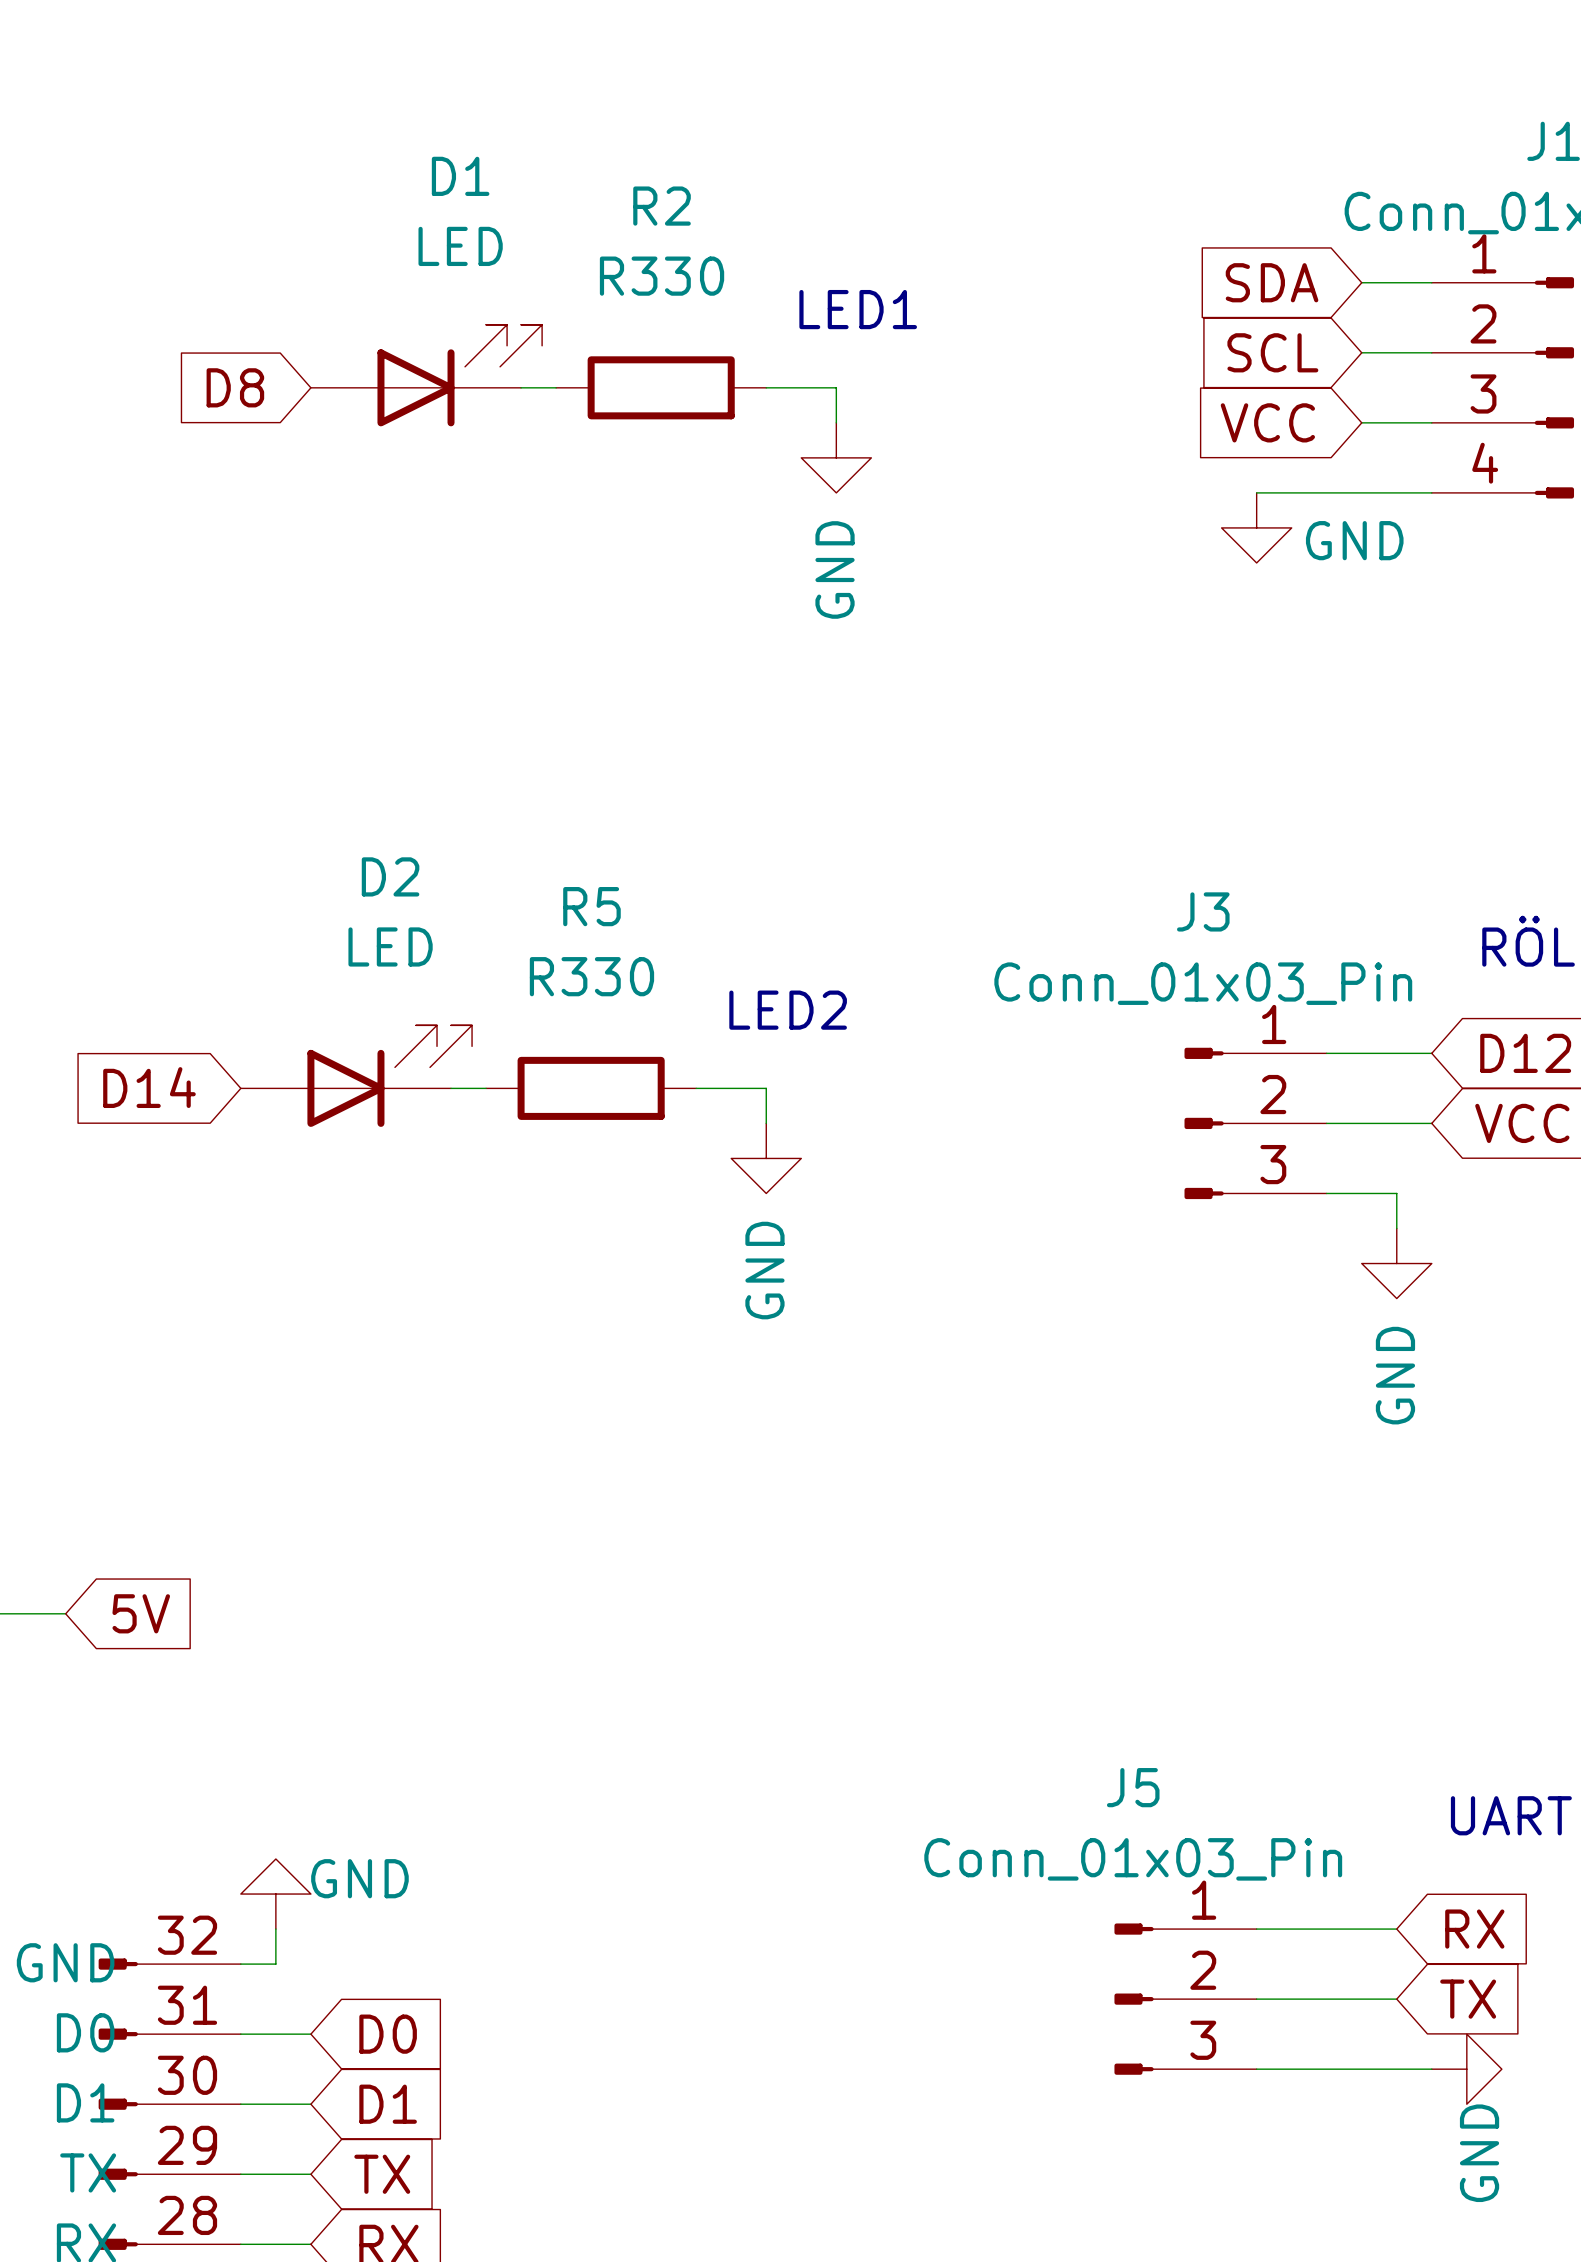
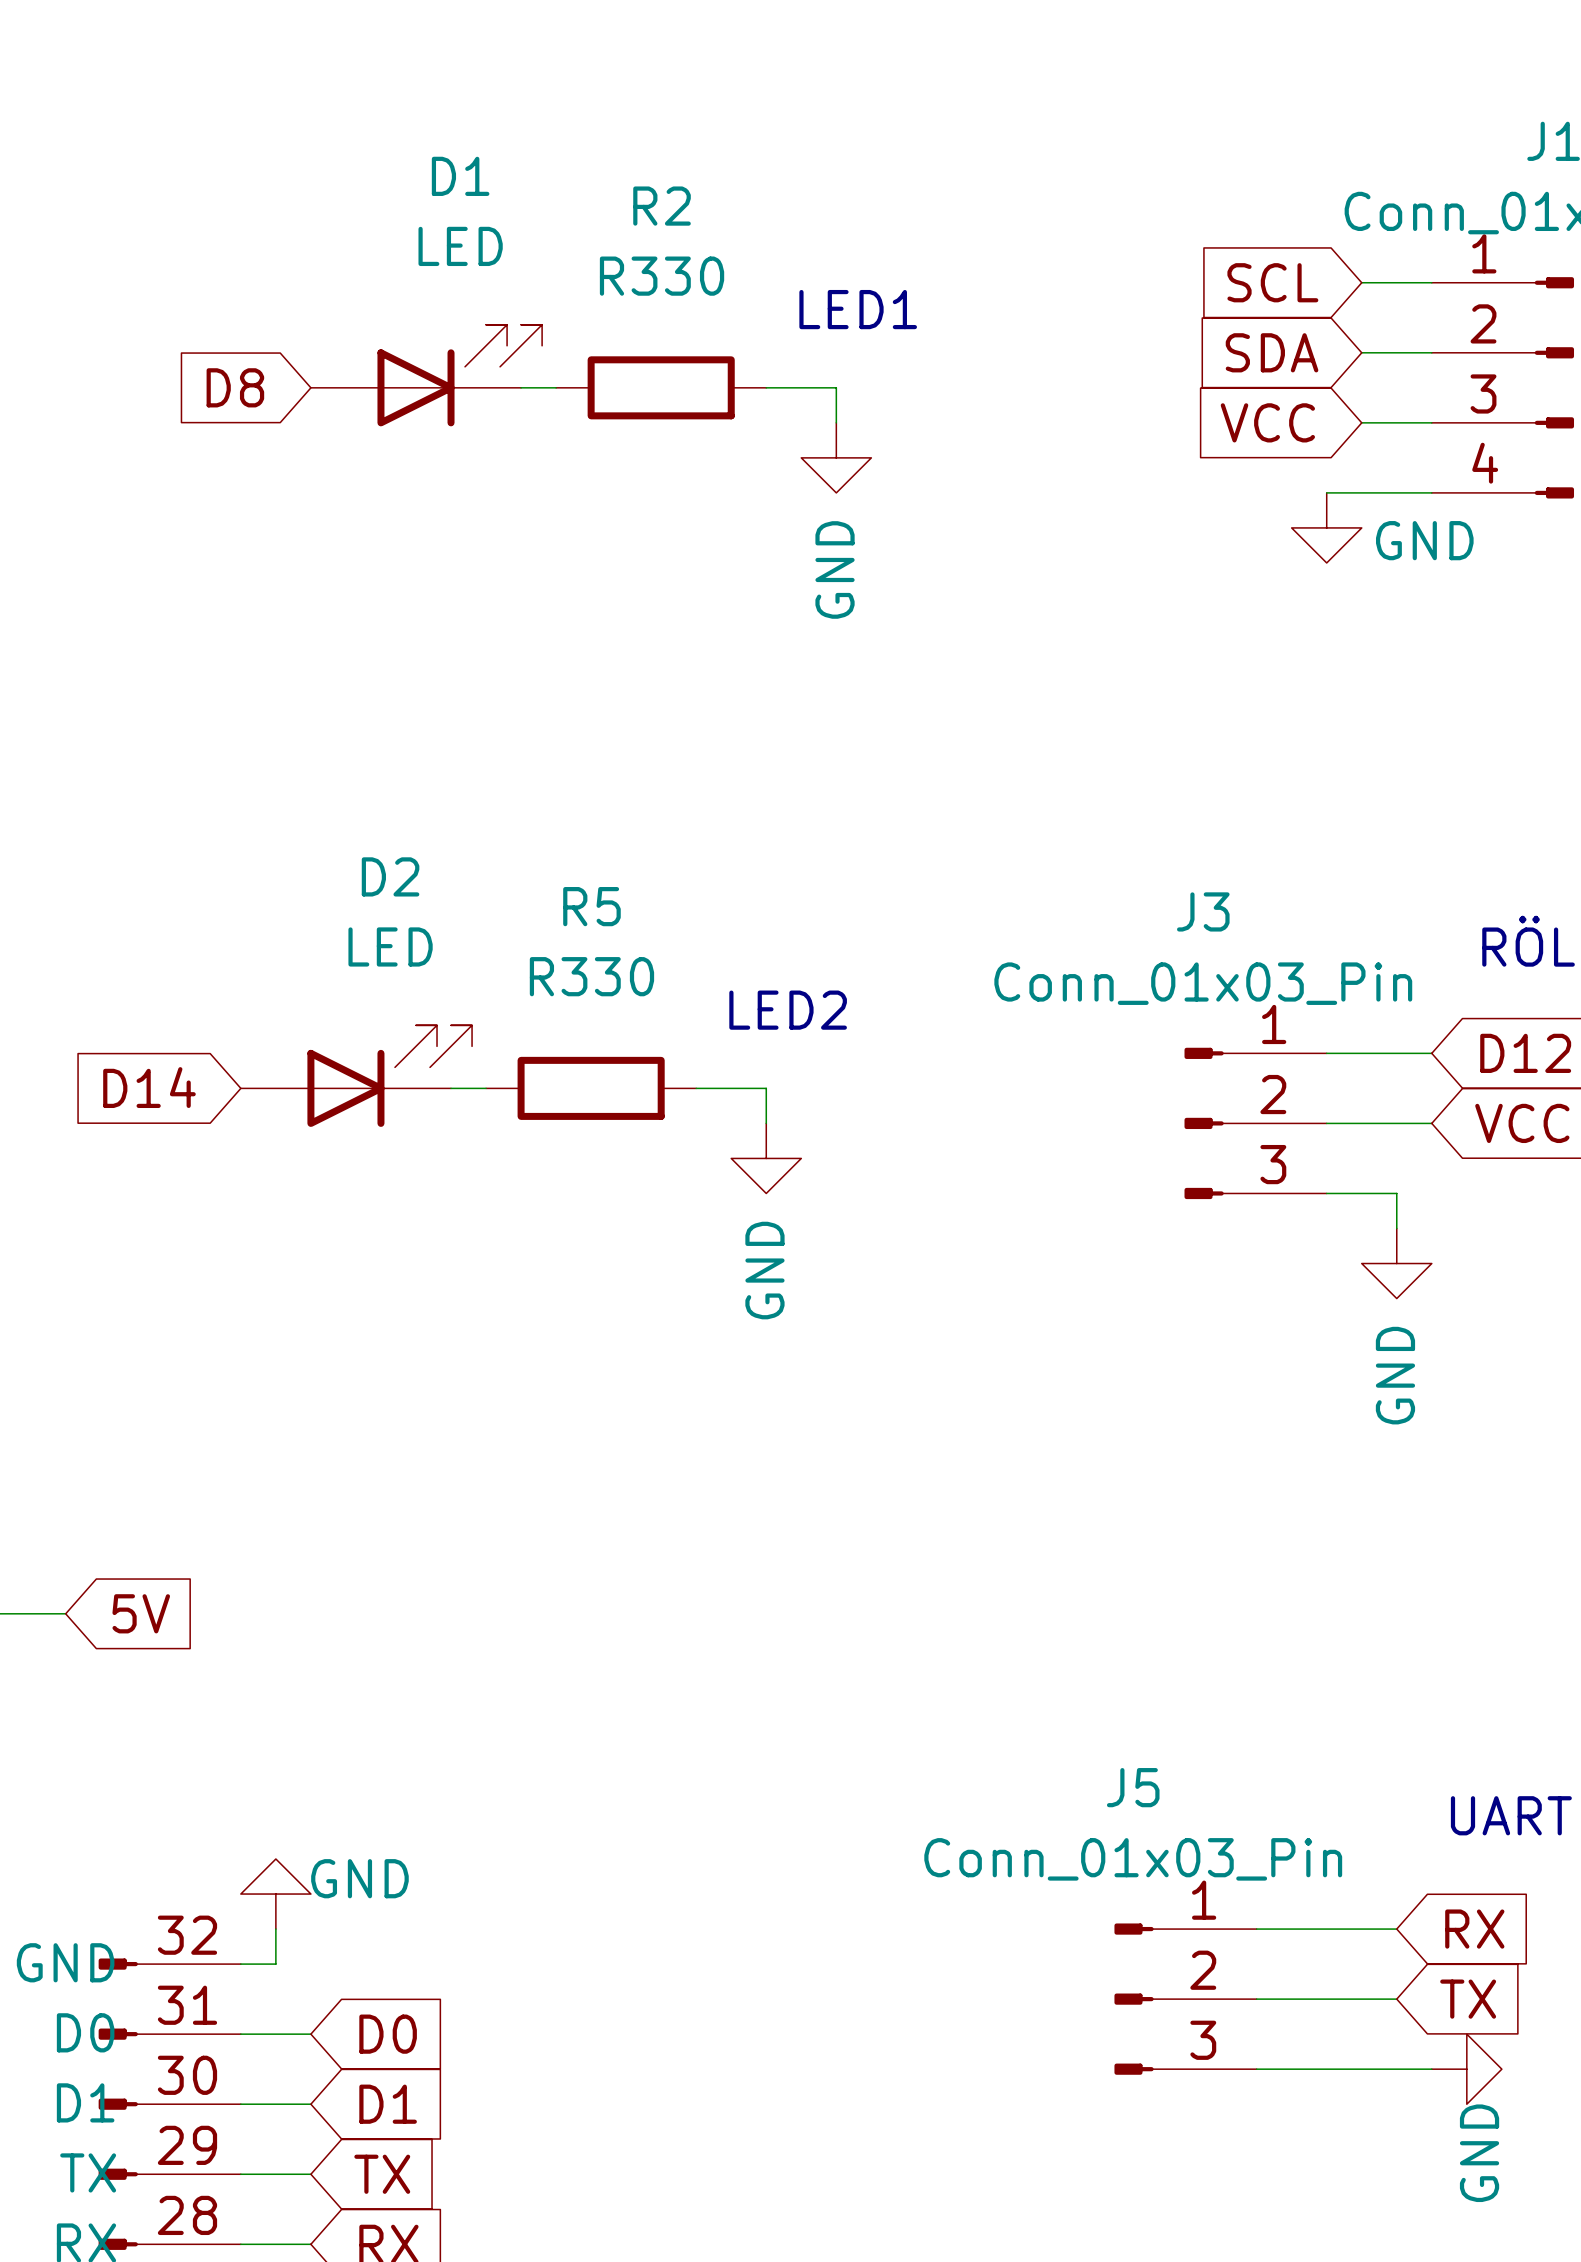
global label: SDA (1272, 282) -> SCL (1272, 282)
global label: SCL (1272, 352) -> SDA (1272, 352)
wire: (1256, 492) (1326, 492) -> none
power symbol position: GND (1256, 527) -> GND (1326, 527)

